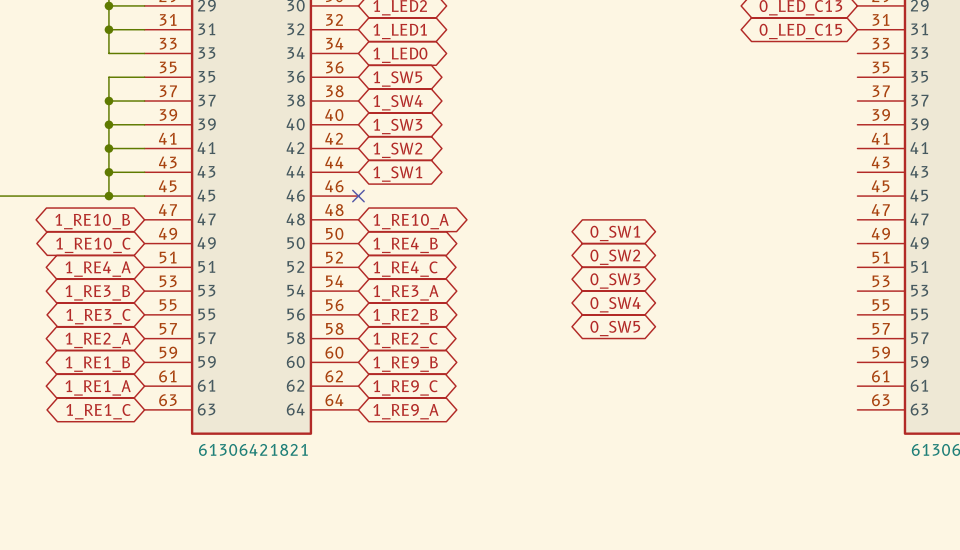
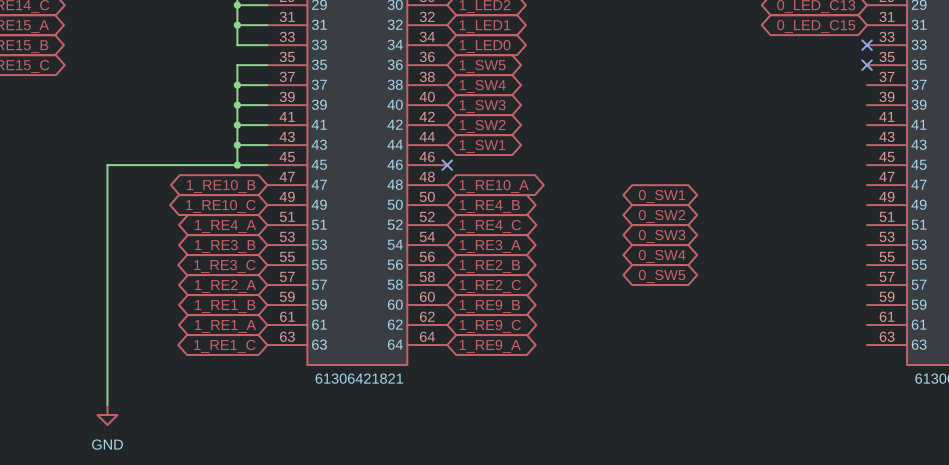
no-connect mark: none -> (867, 45)
no-connect mark: none -> (867, 65)

